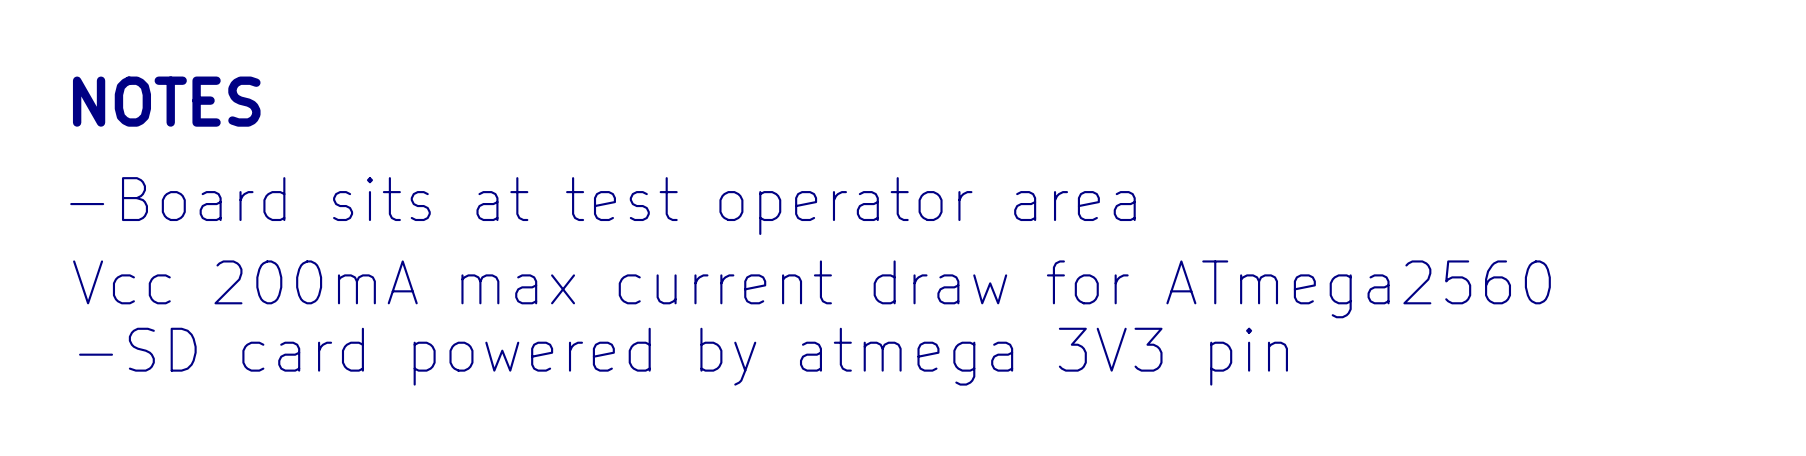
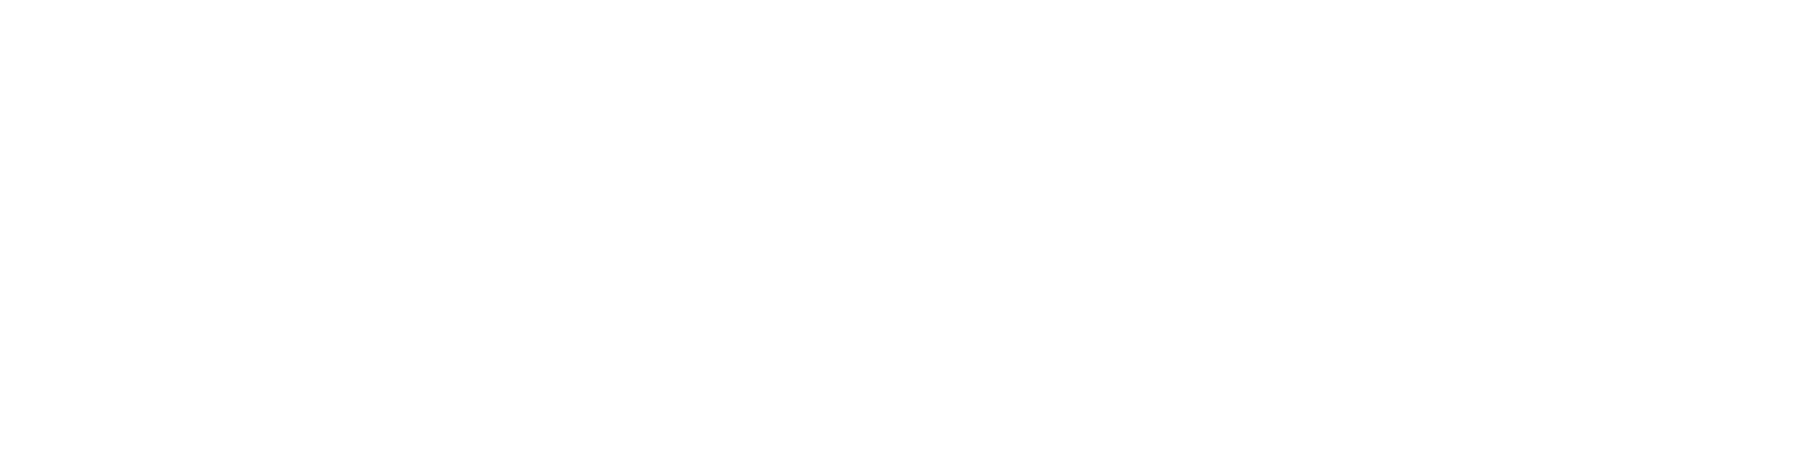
text: NOTES (166, 101) -> none
text: -Board sits at test operator area (602, 206) -> none
text: Vcc 200mA max current draw for ATmega2560 (811, 289) -> none
text: -SD card powered by atmega 3V3 pin (683, 356) -> none

